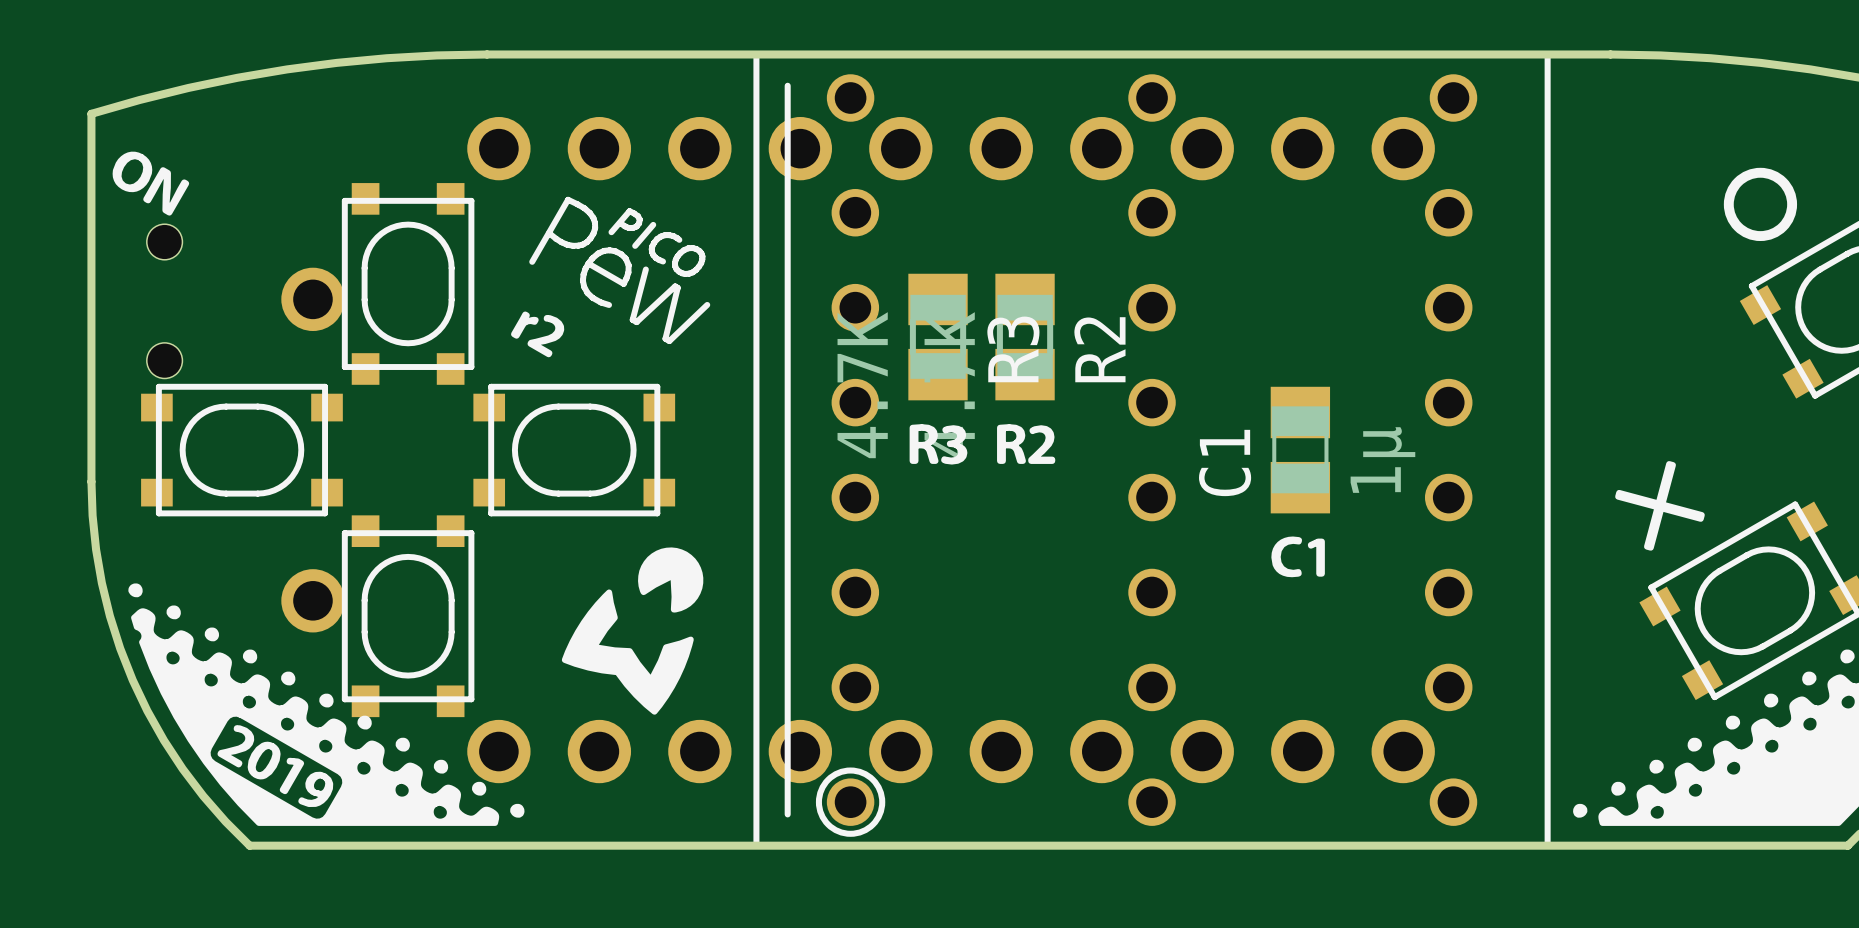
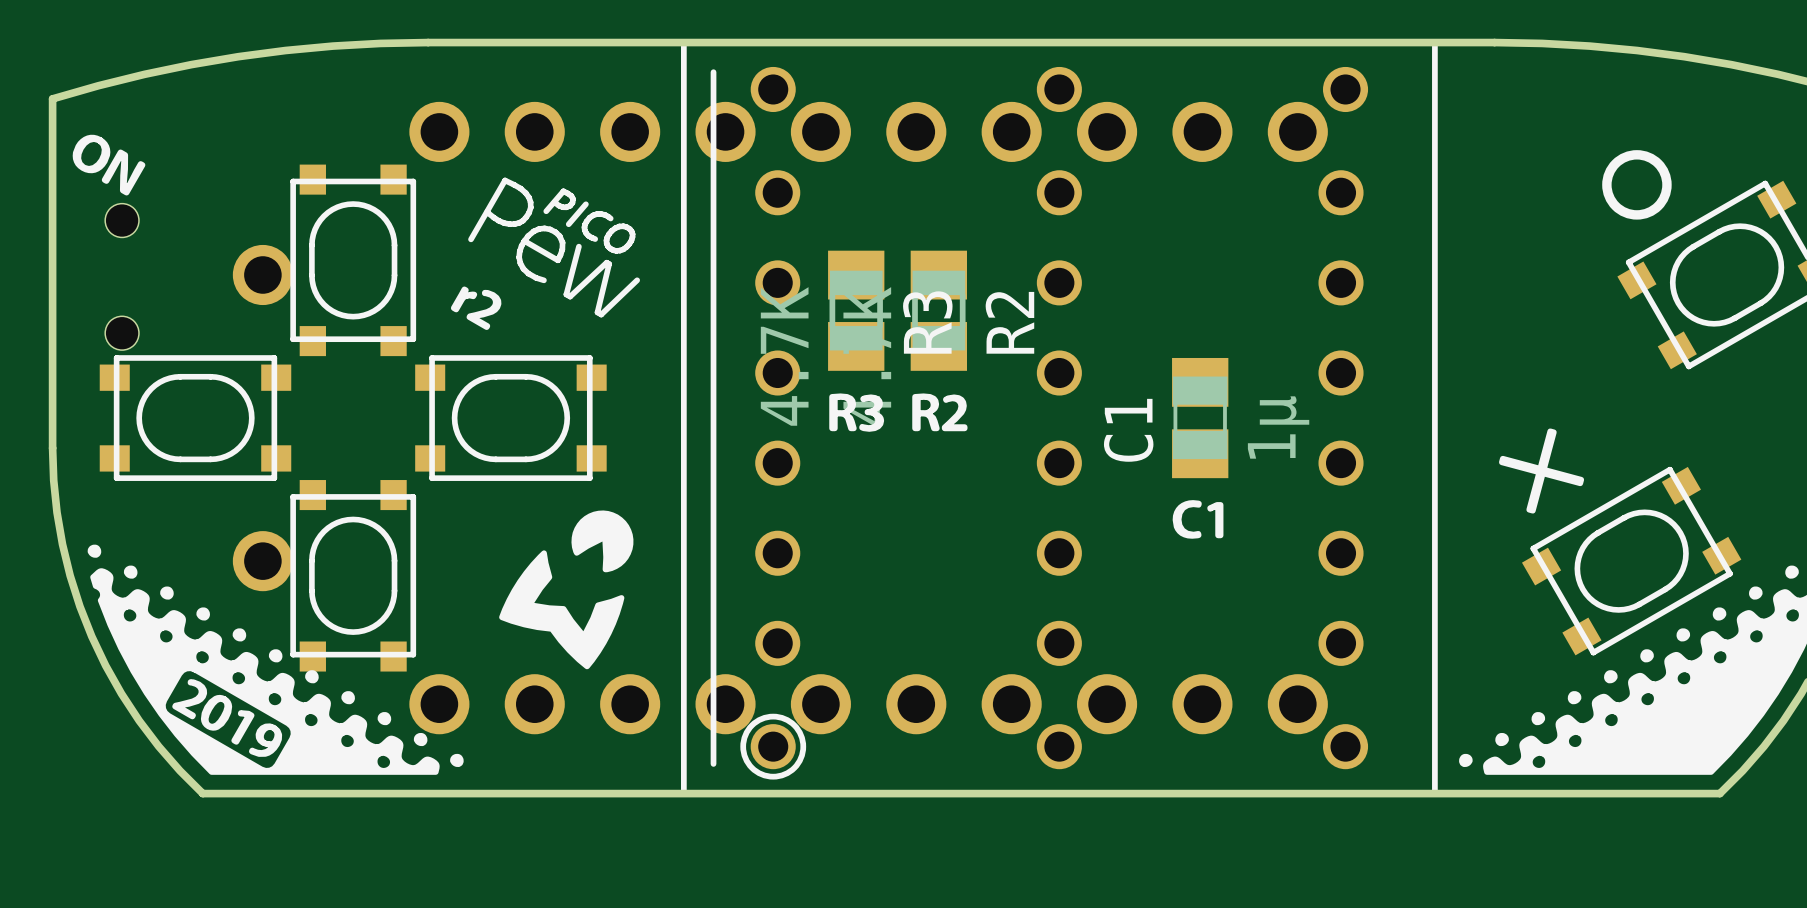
part footprint: [753, 51, 1551, 849] -> [680, 39, 1438, 797]

